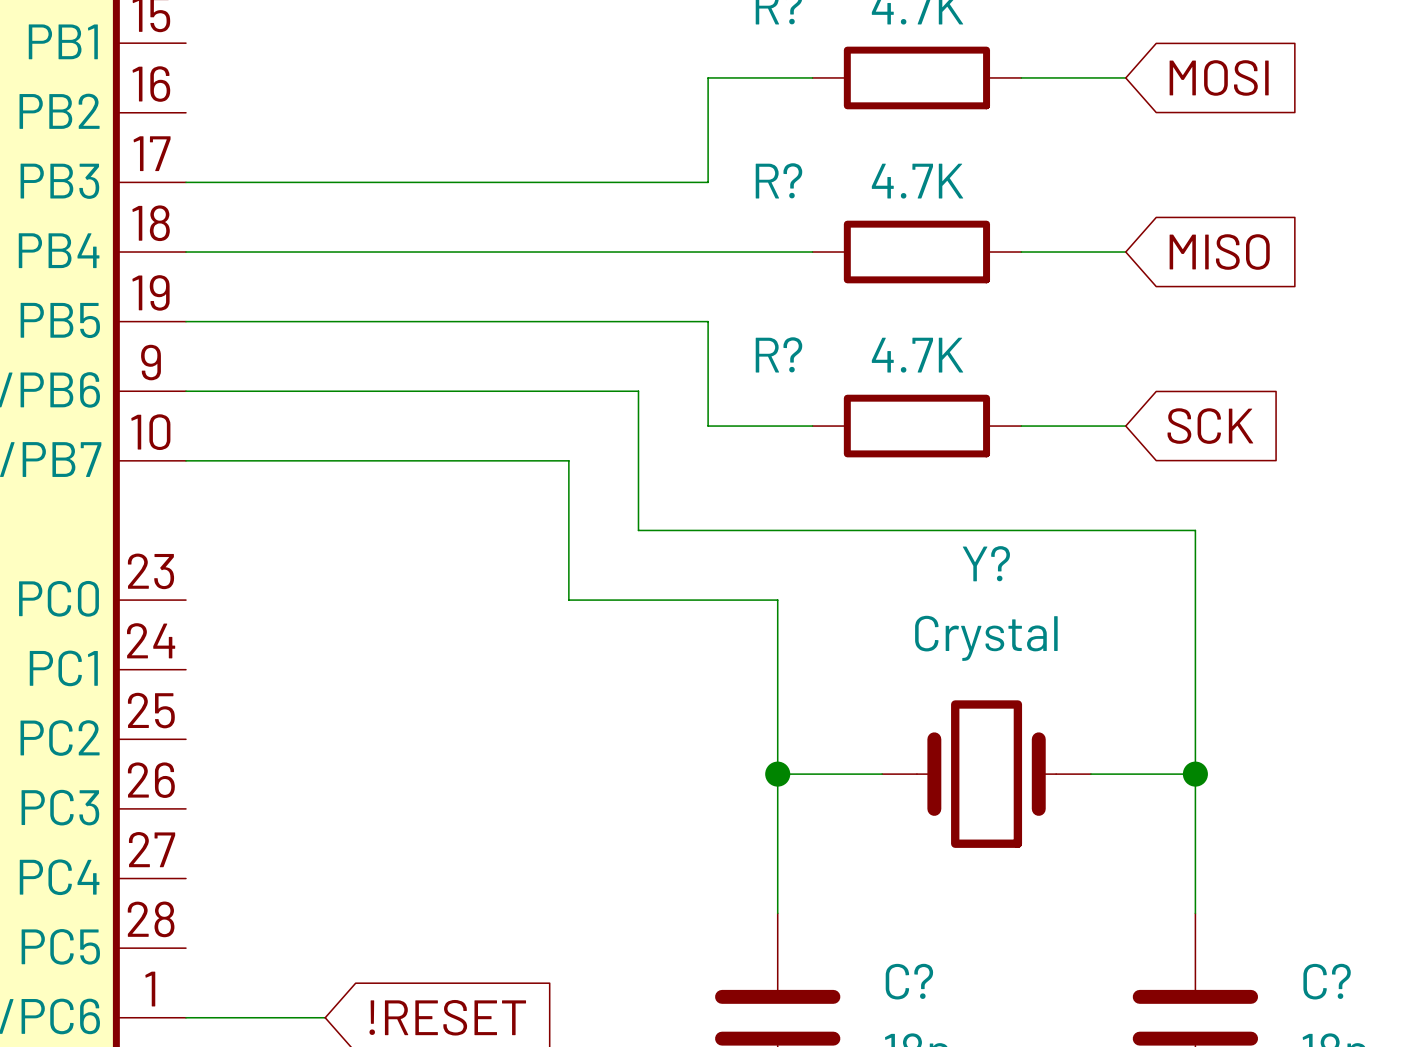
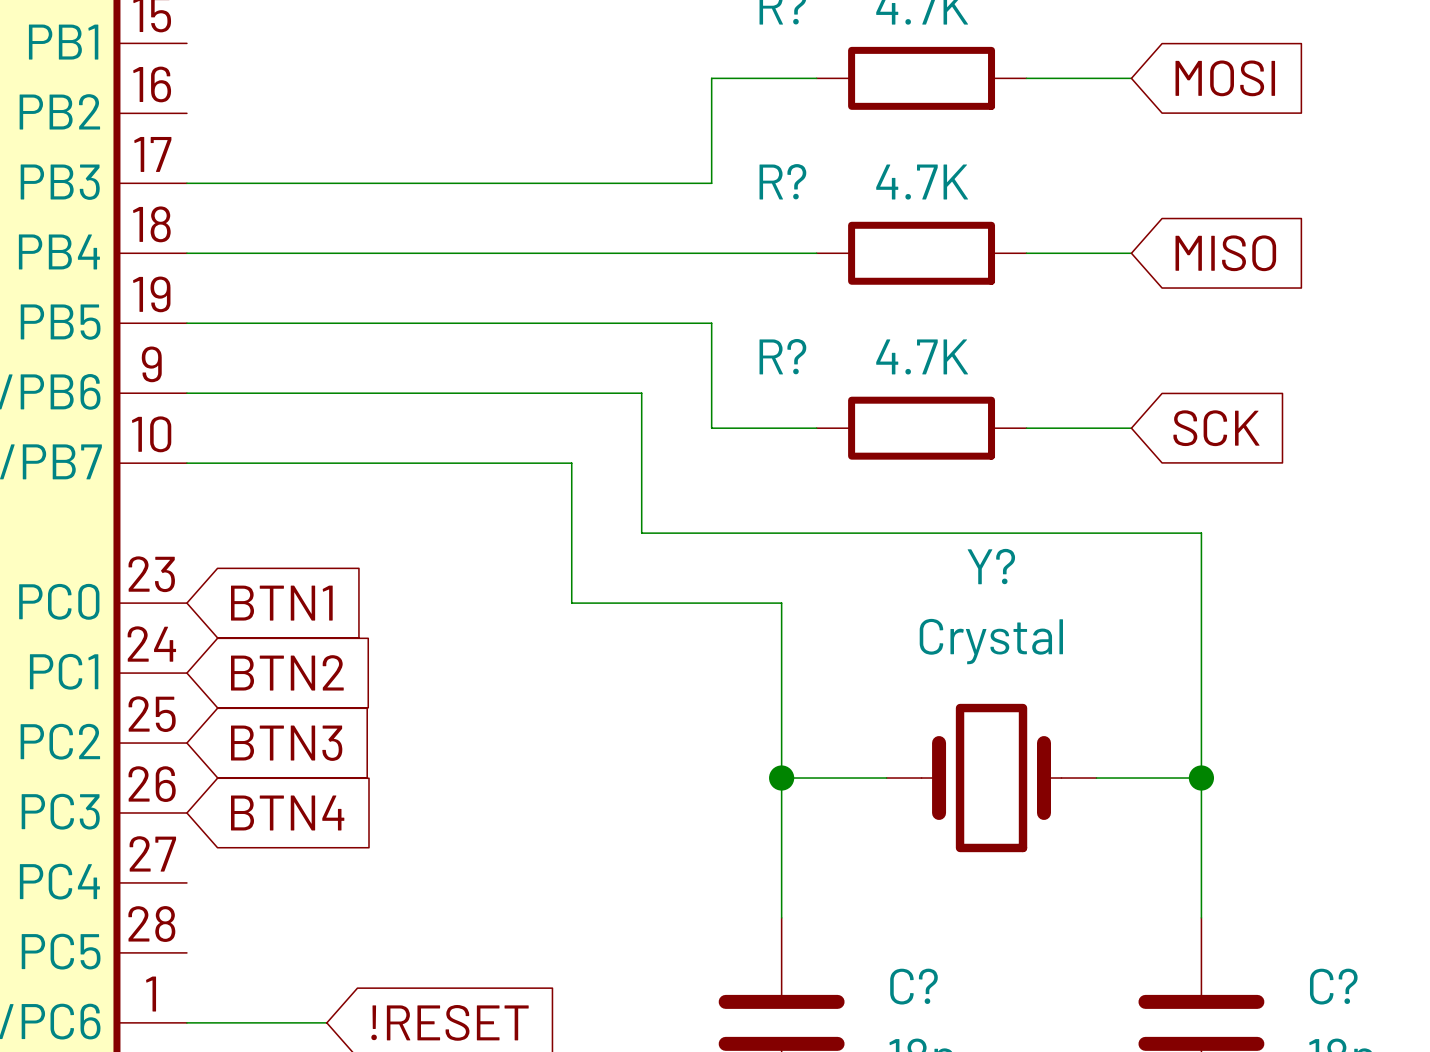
global label: none -> BTN1 (281, 603)
global label: none -> BTN2 (287, 672)
global label: none -> BTN3 (286, 743)
global label: none -> BTN4 (287, 812)

